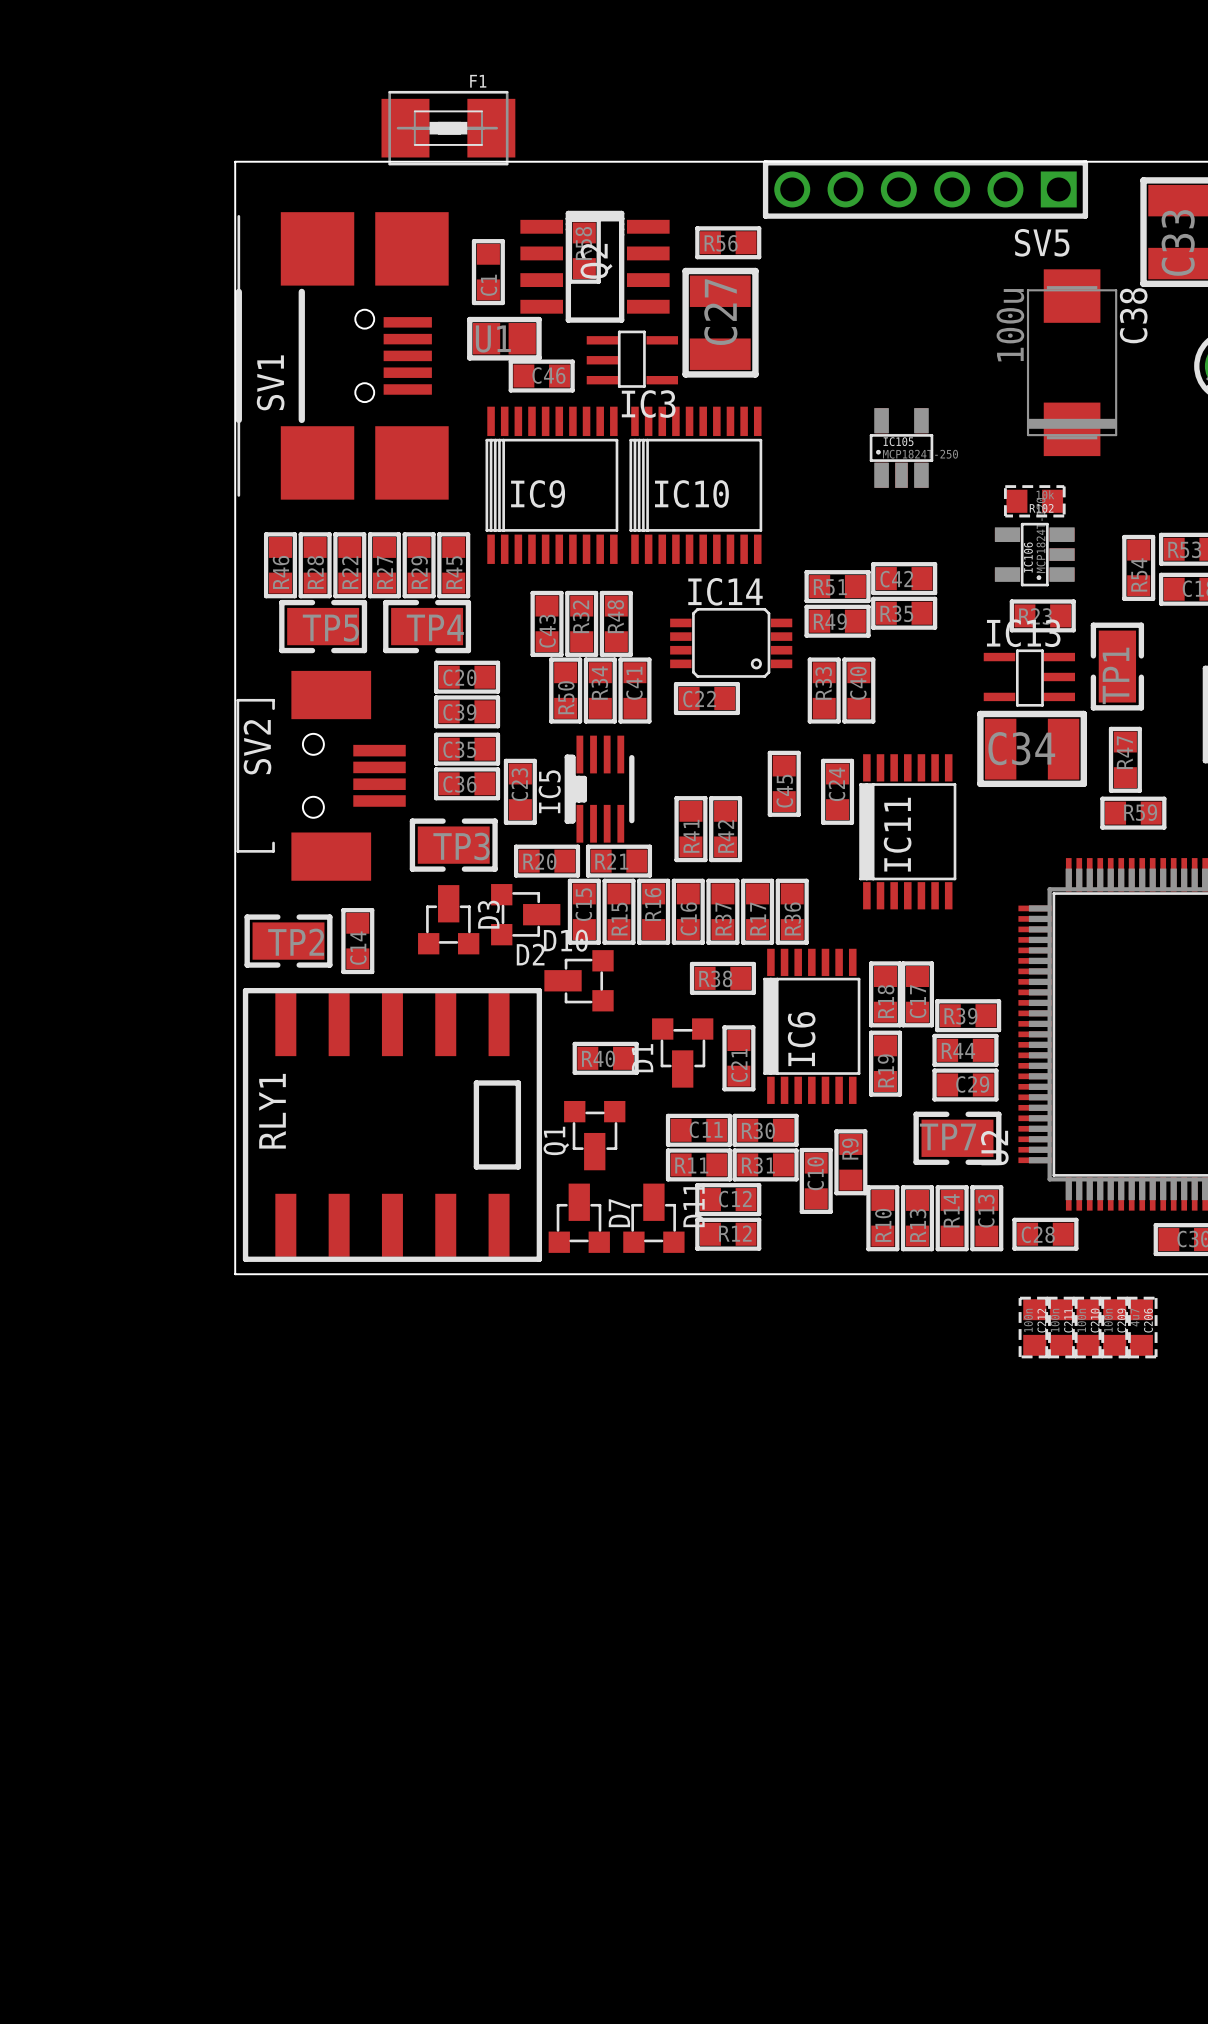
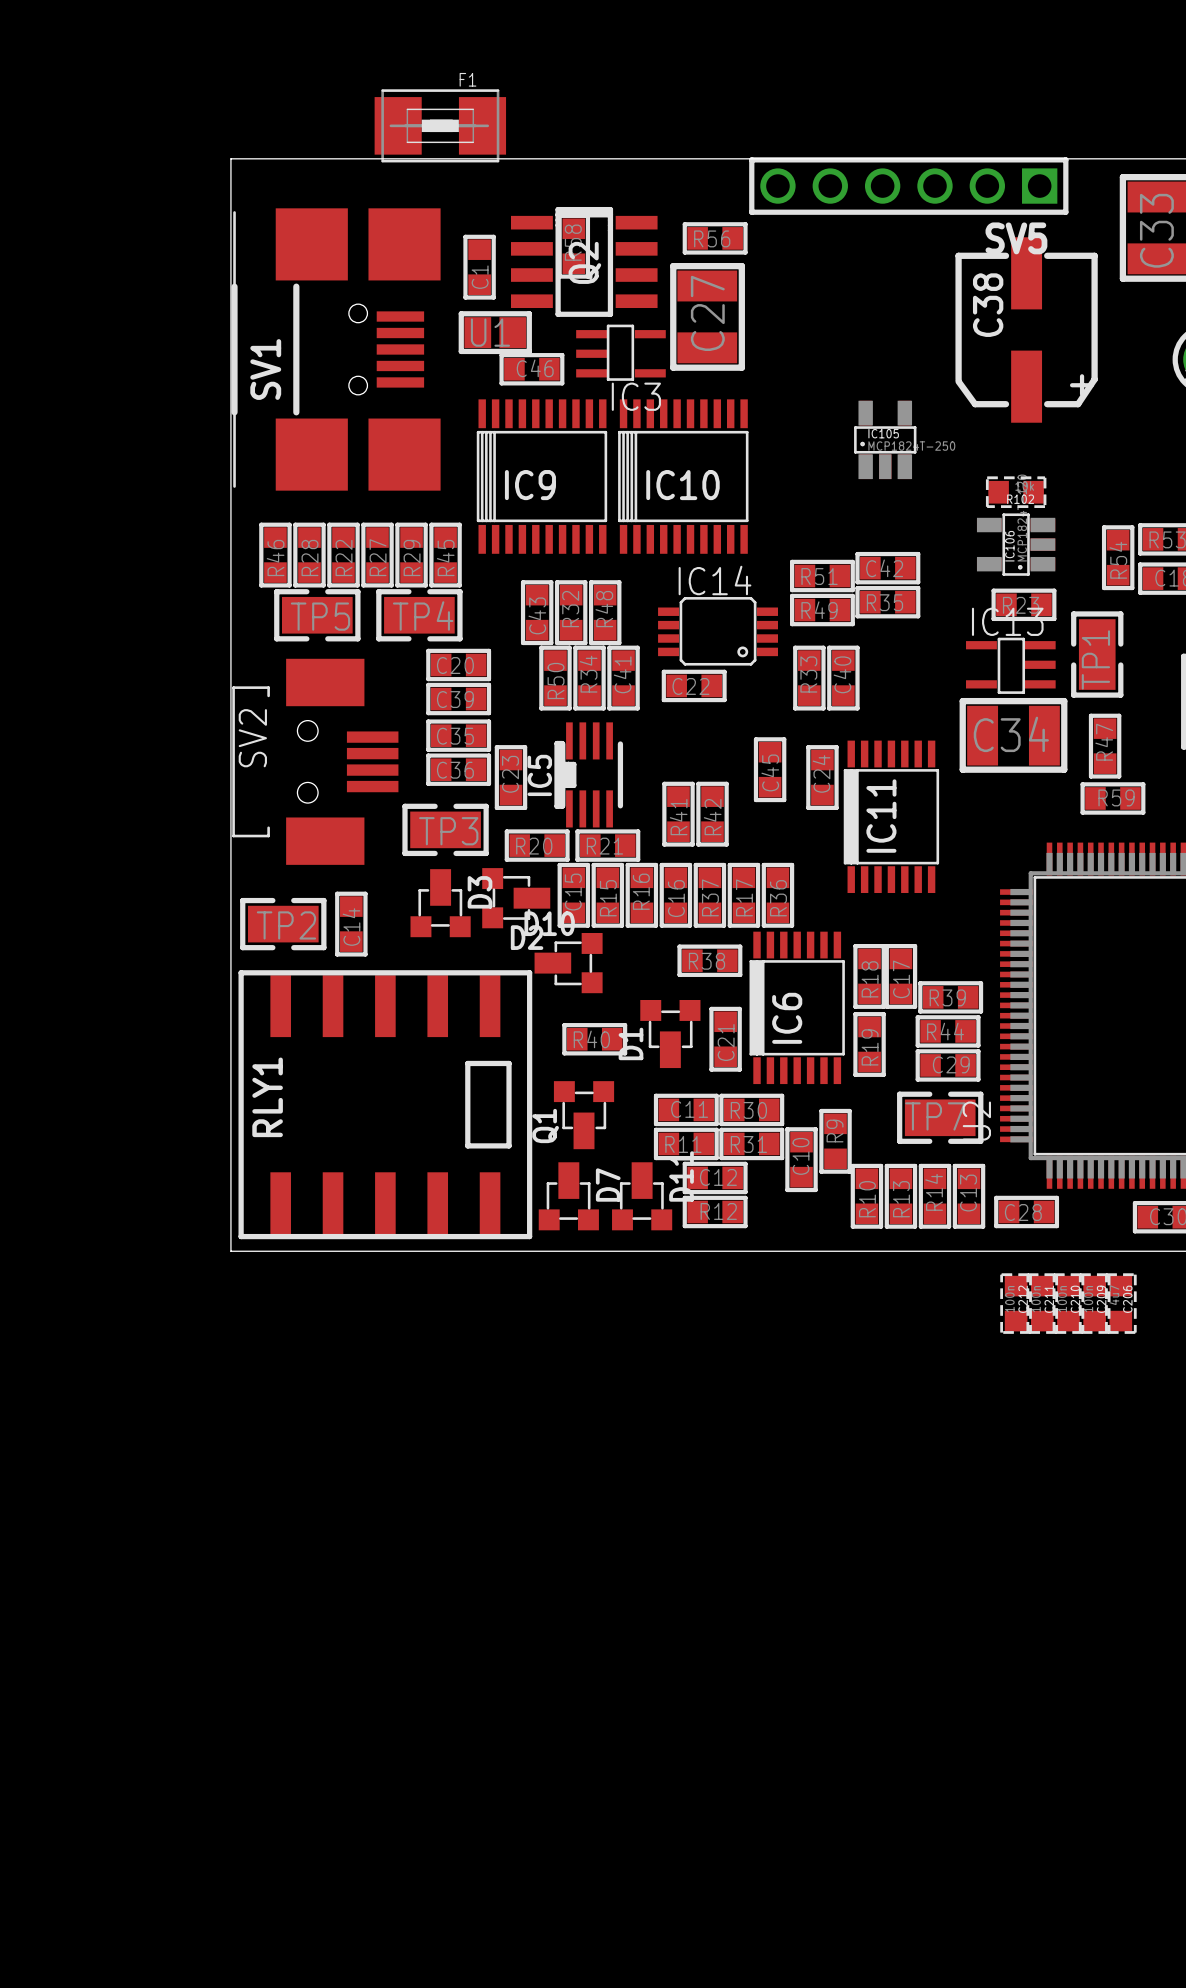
C38 footprint: [1026, 269, 1118, 457] -> [955, 237, 1098, 423]
C38 name position: C38 (1133, 315) -> C38 (988, 305)
C38 value: 100u (1010, 325) -> none

